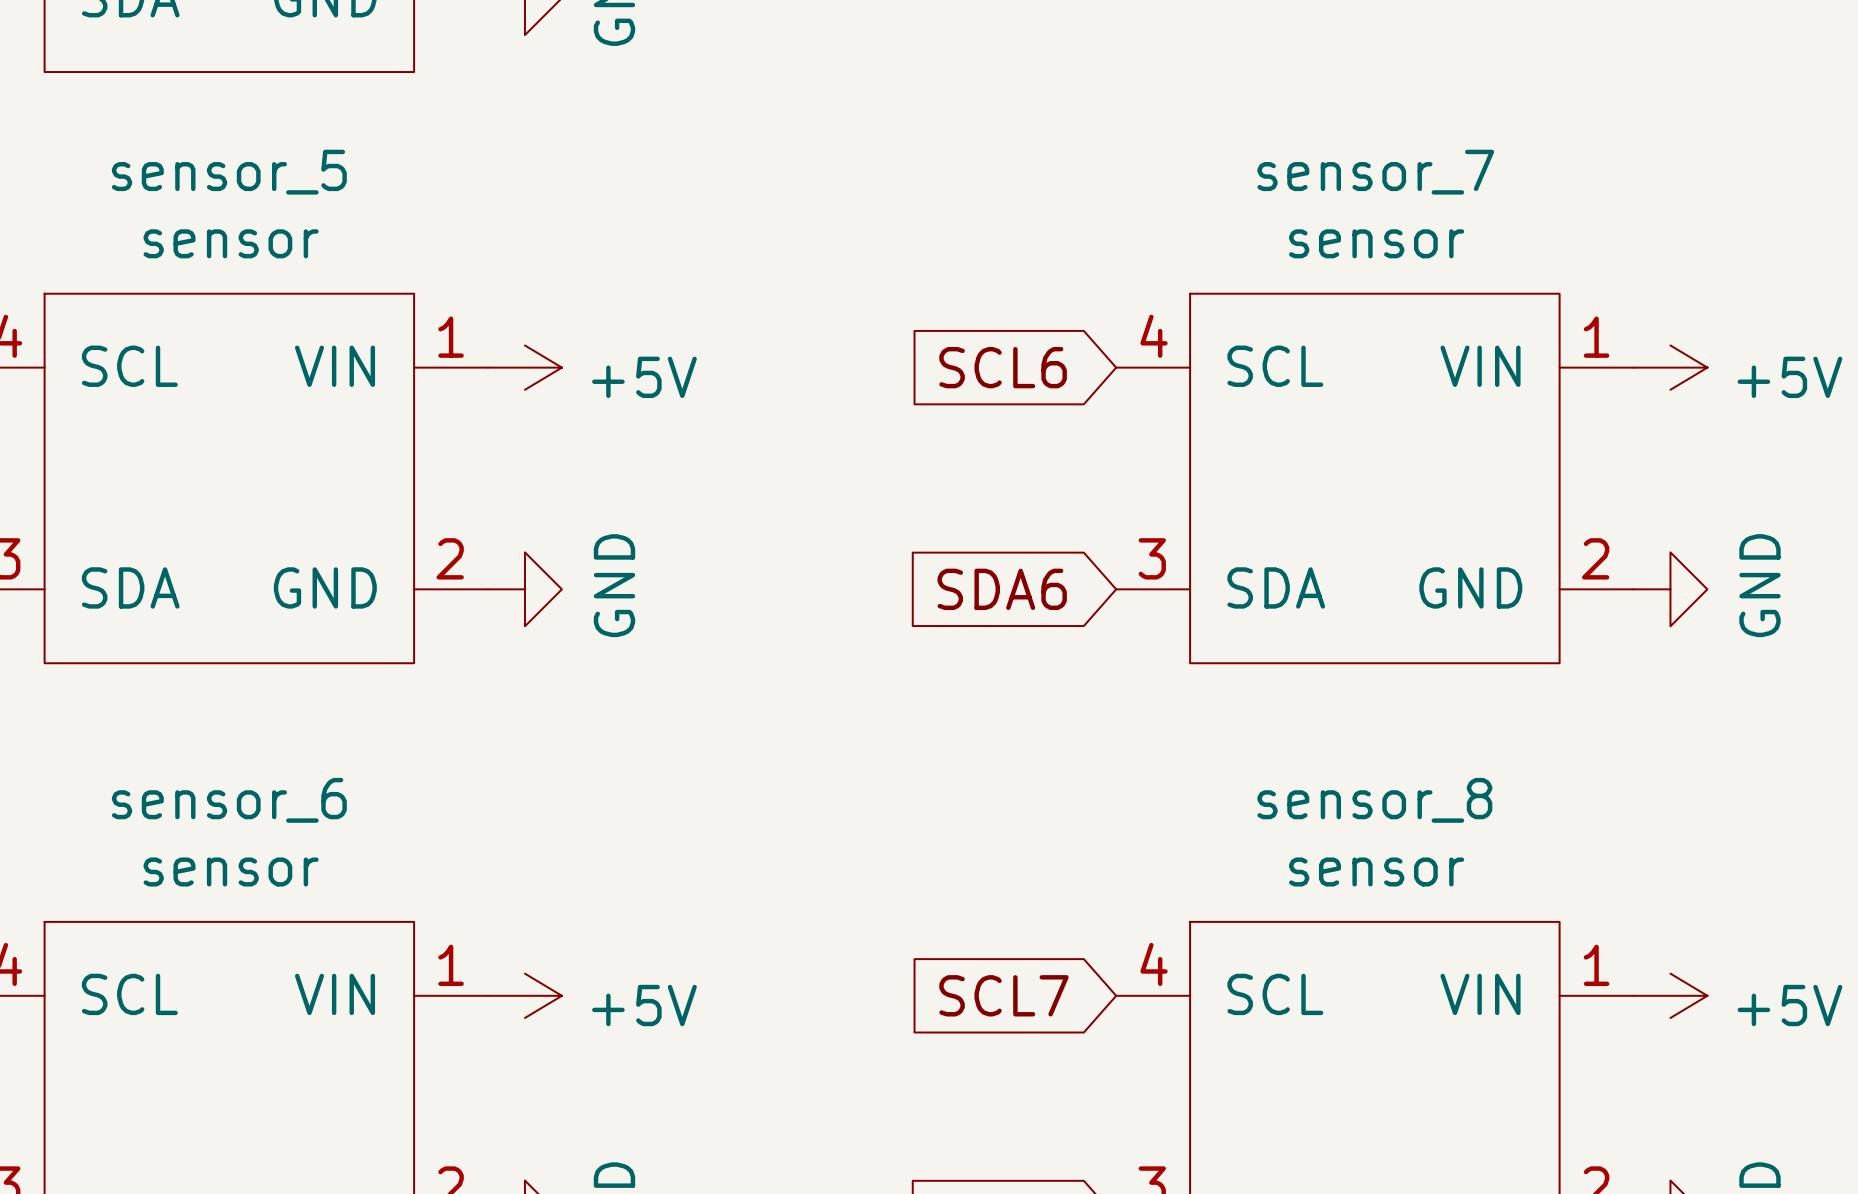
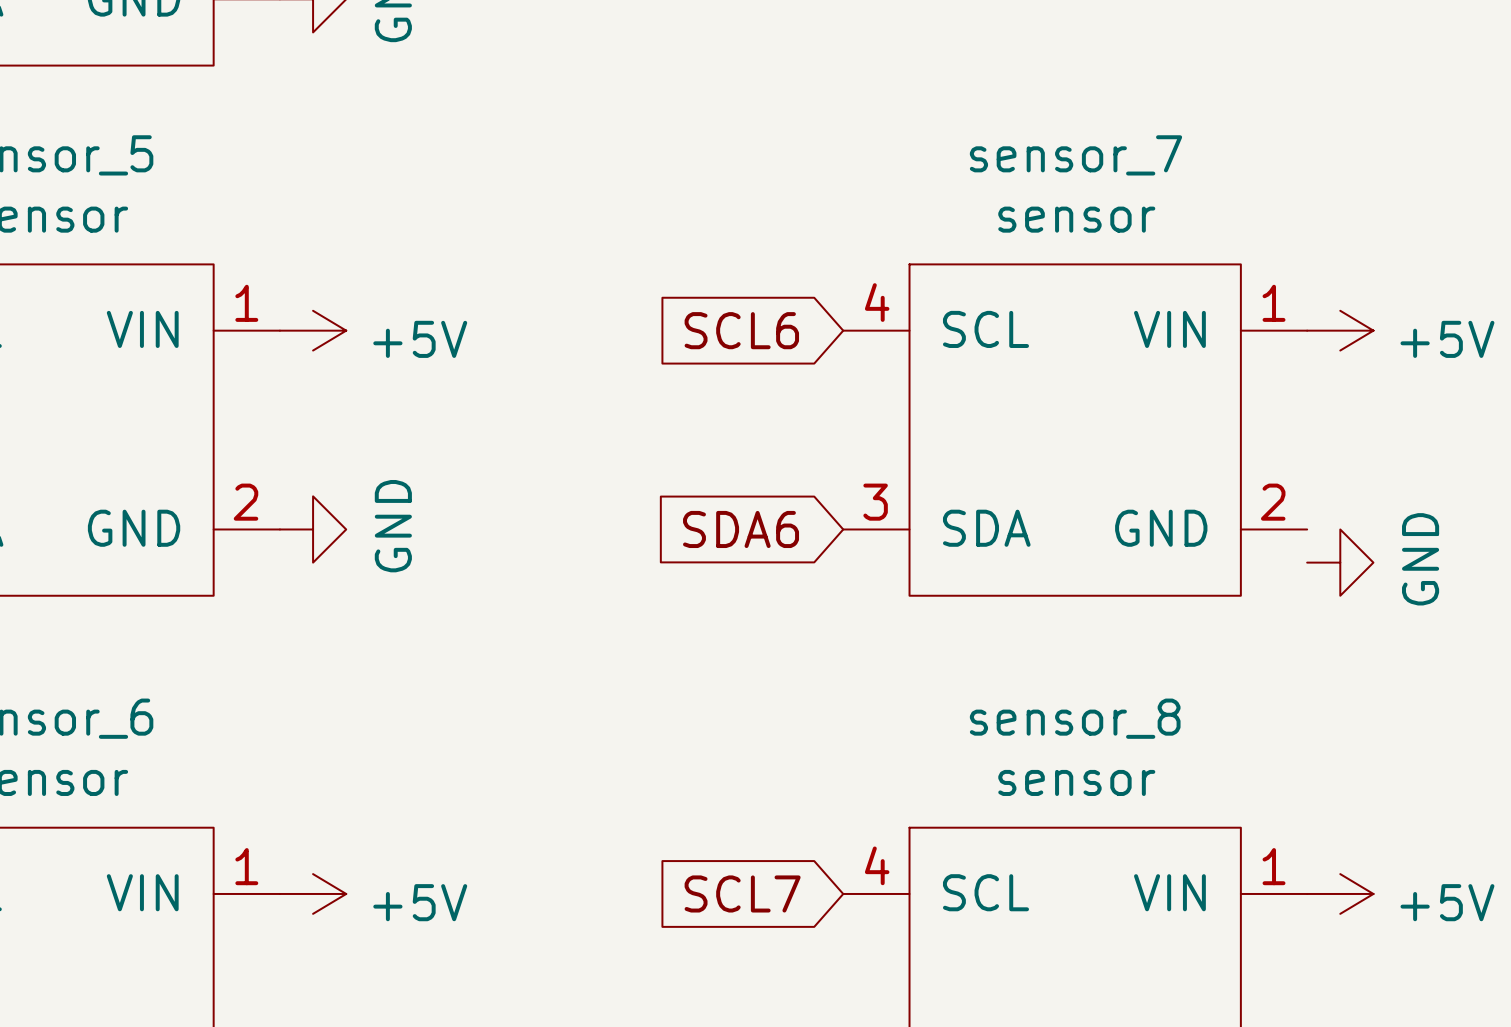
power symbol position: GND (1670, 589) -> GND (1340, 562)

